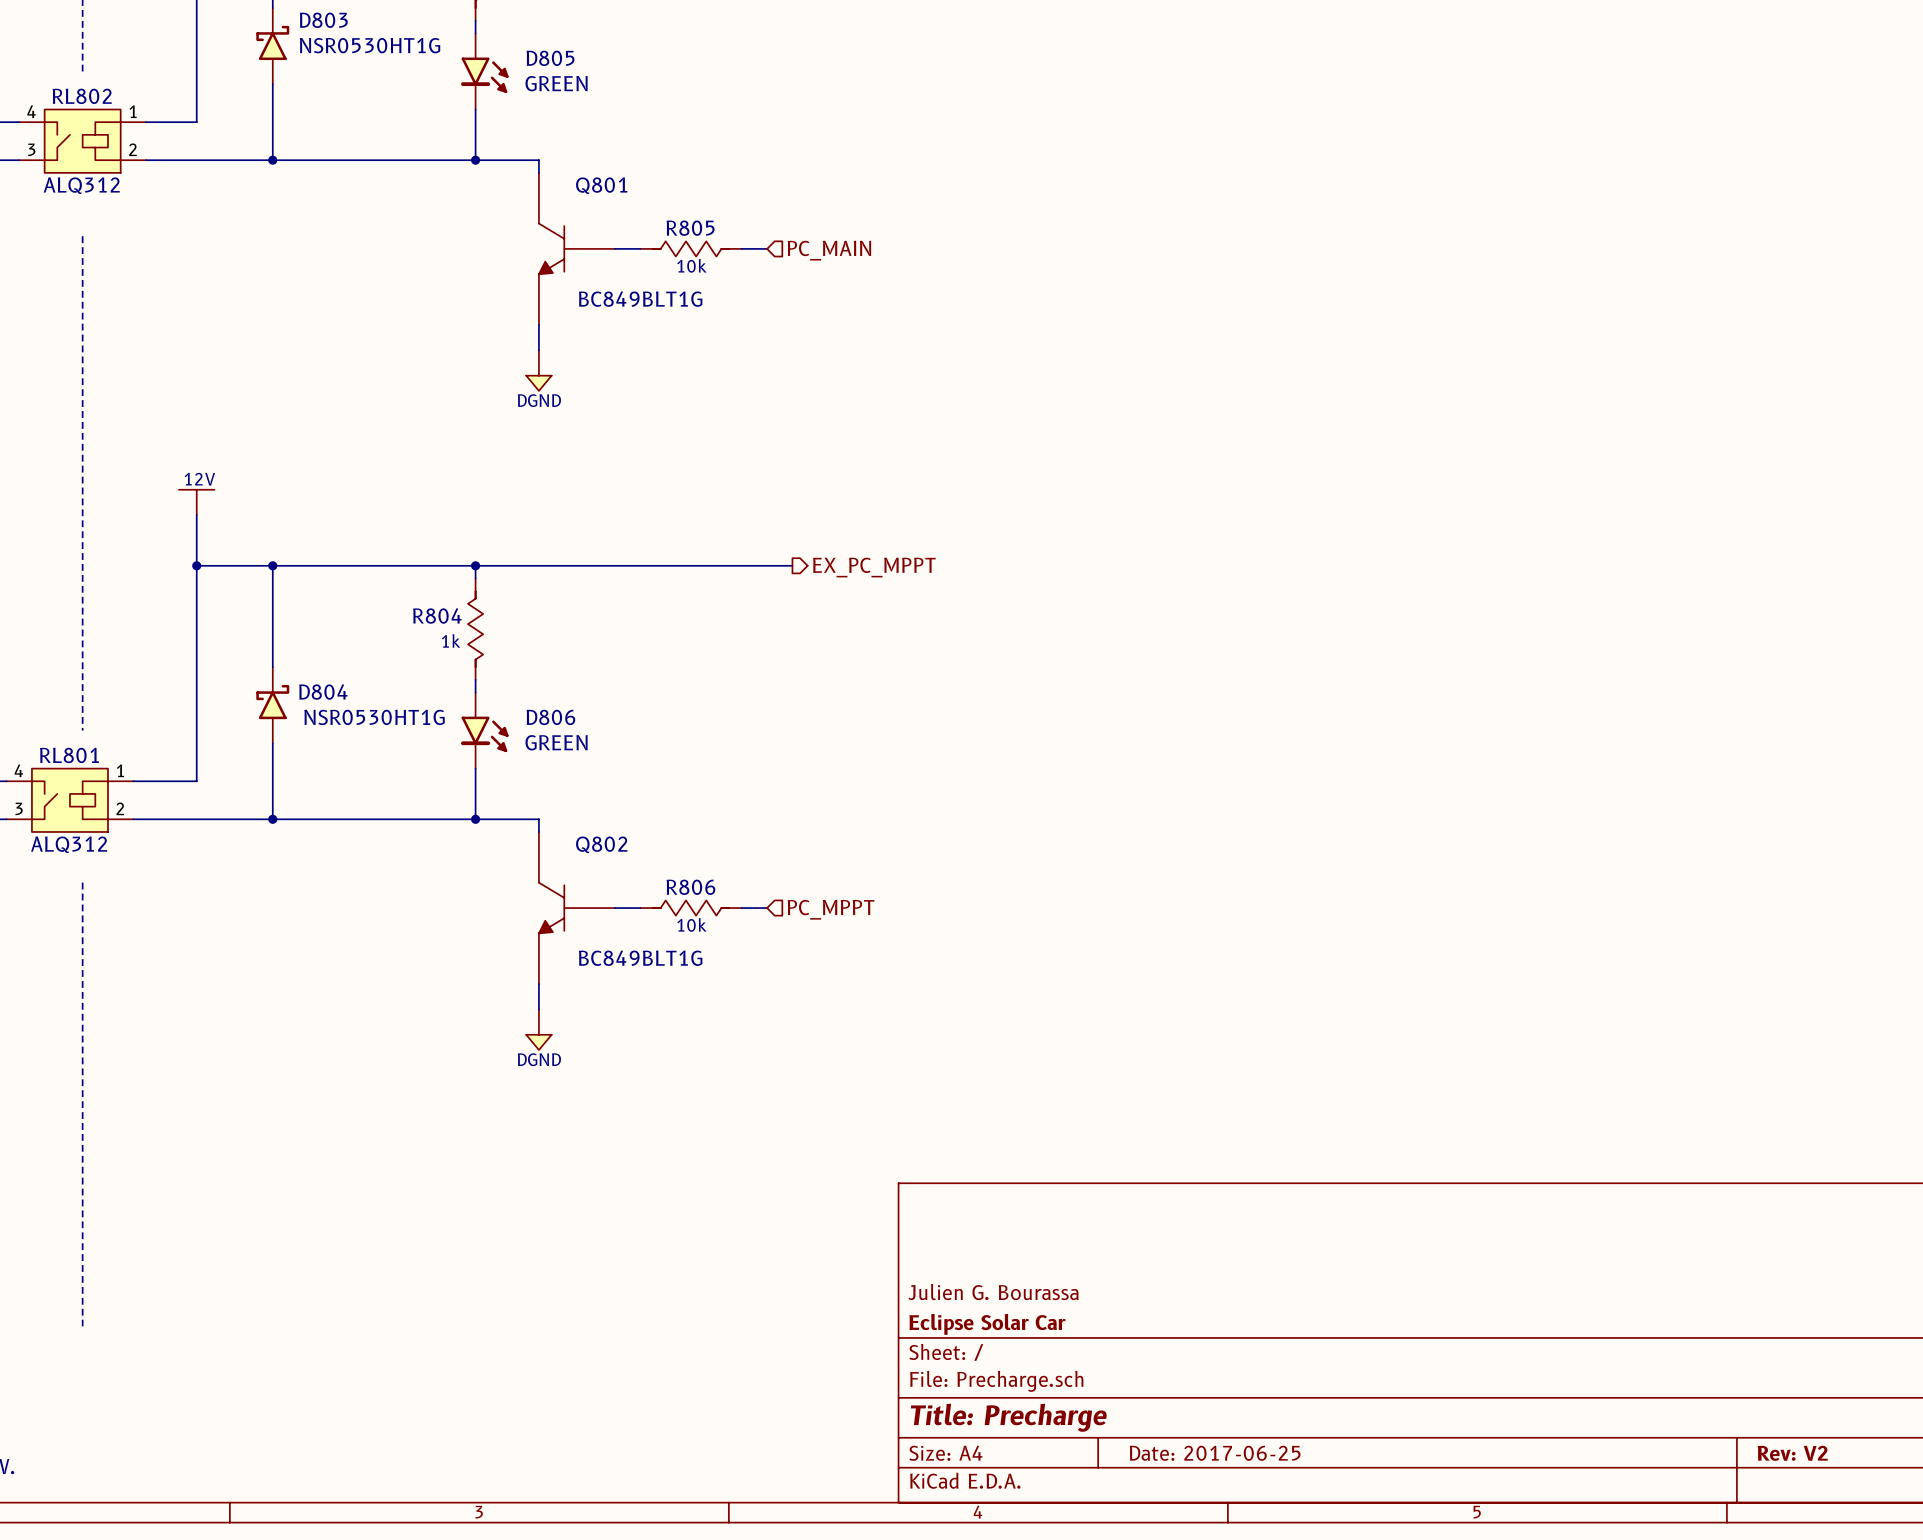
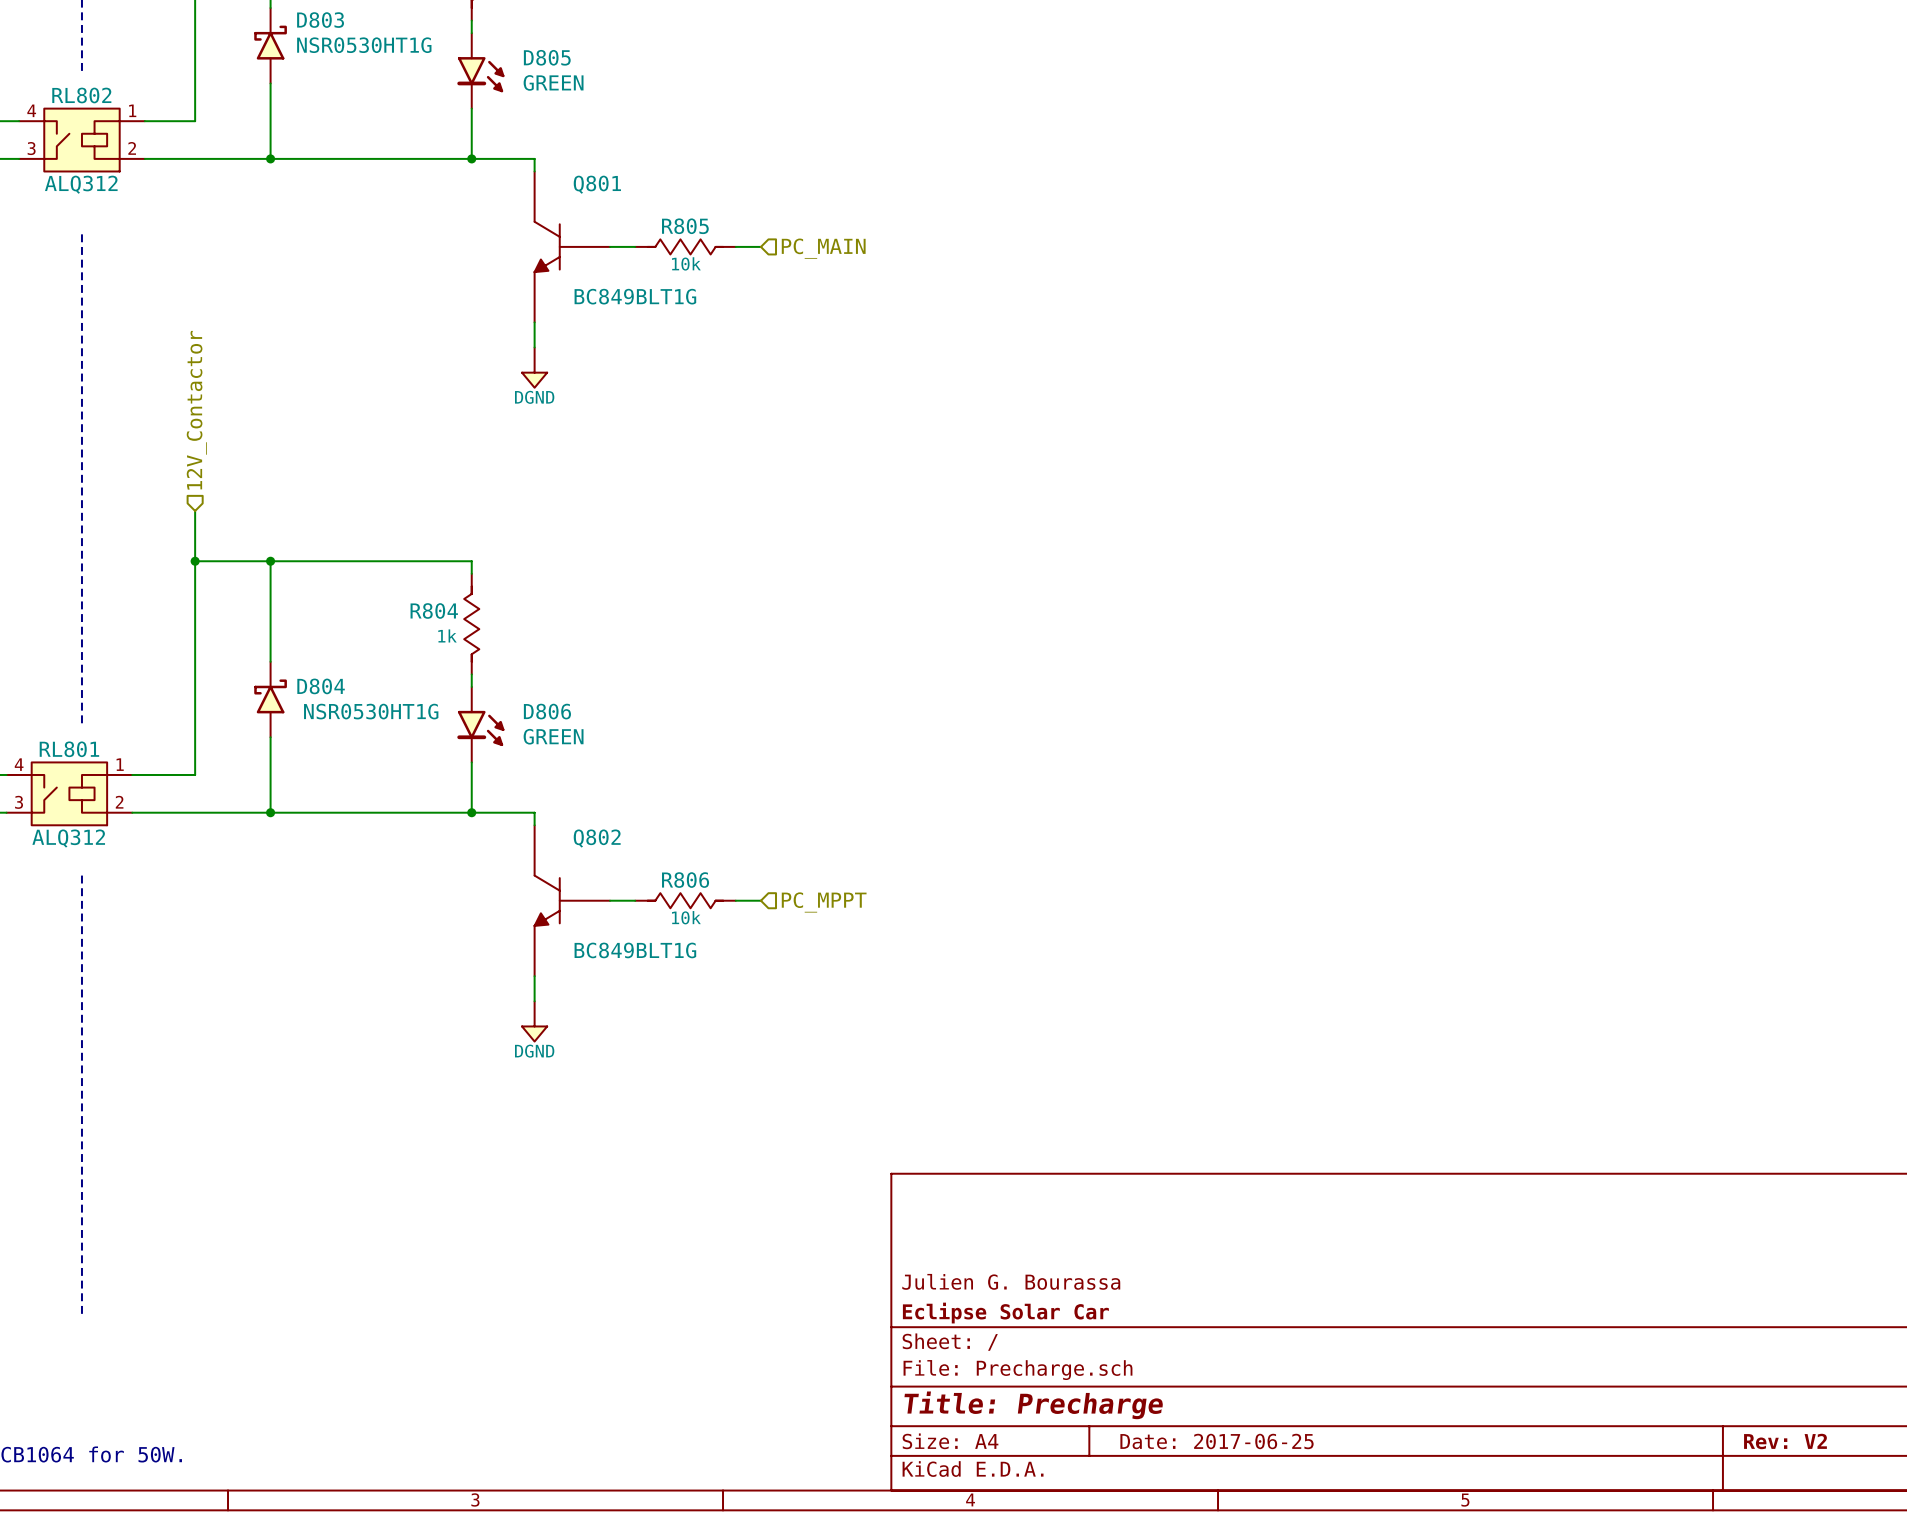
hierarchical label: none -> 12V_Contactor (196, 410)
power symbol: 12V (196, 502) -> none
wire: (475, 565) (792, 565) -> none
junction: (475, 565) -> none
hierarchical label: EX_PC_MPPT (874, 567) -> none

